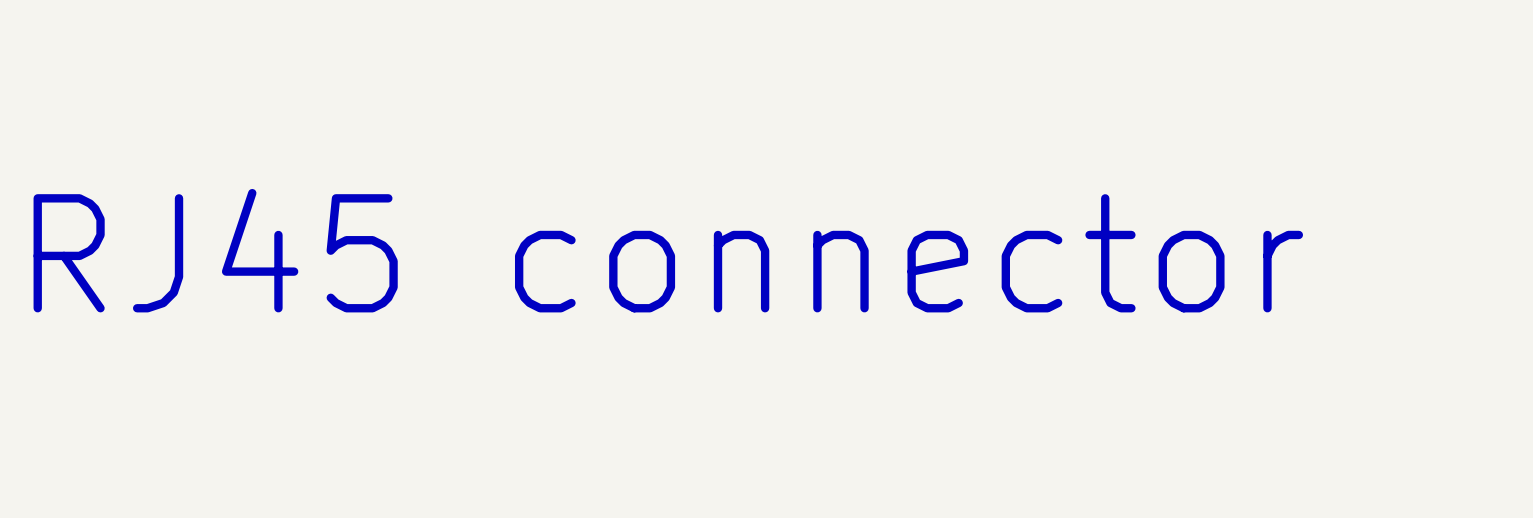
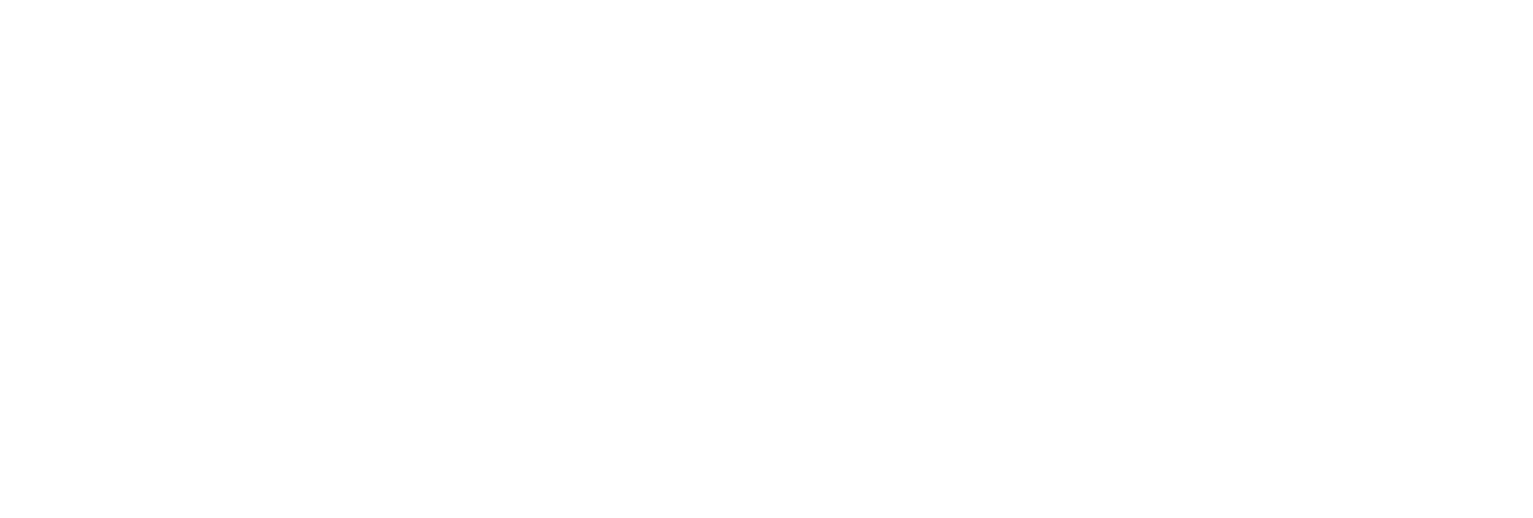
text: RJ45 connector (668, 250) -> none

